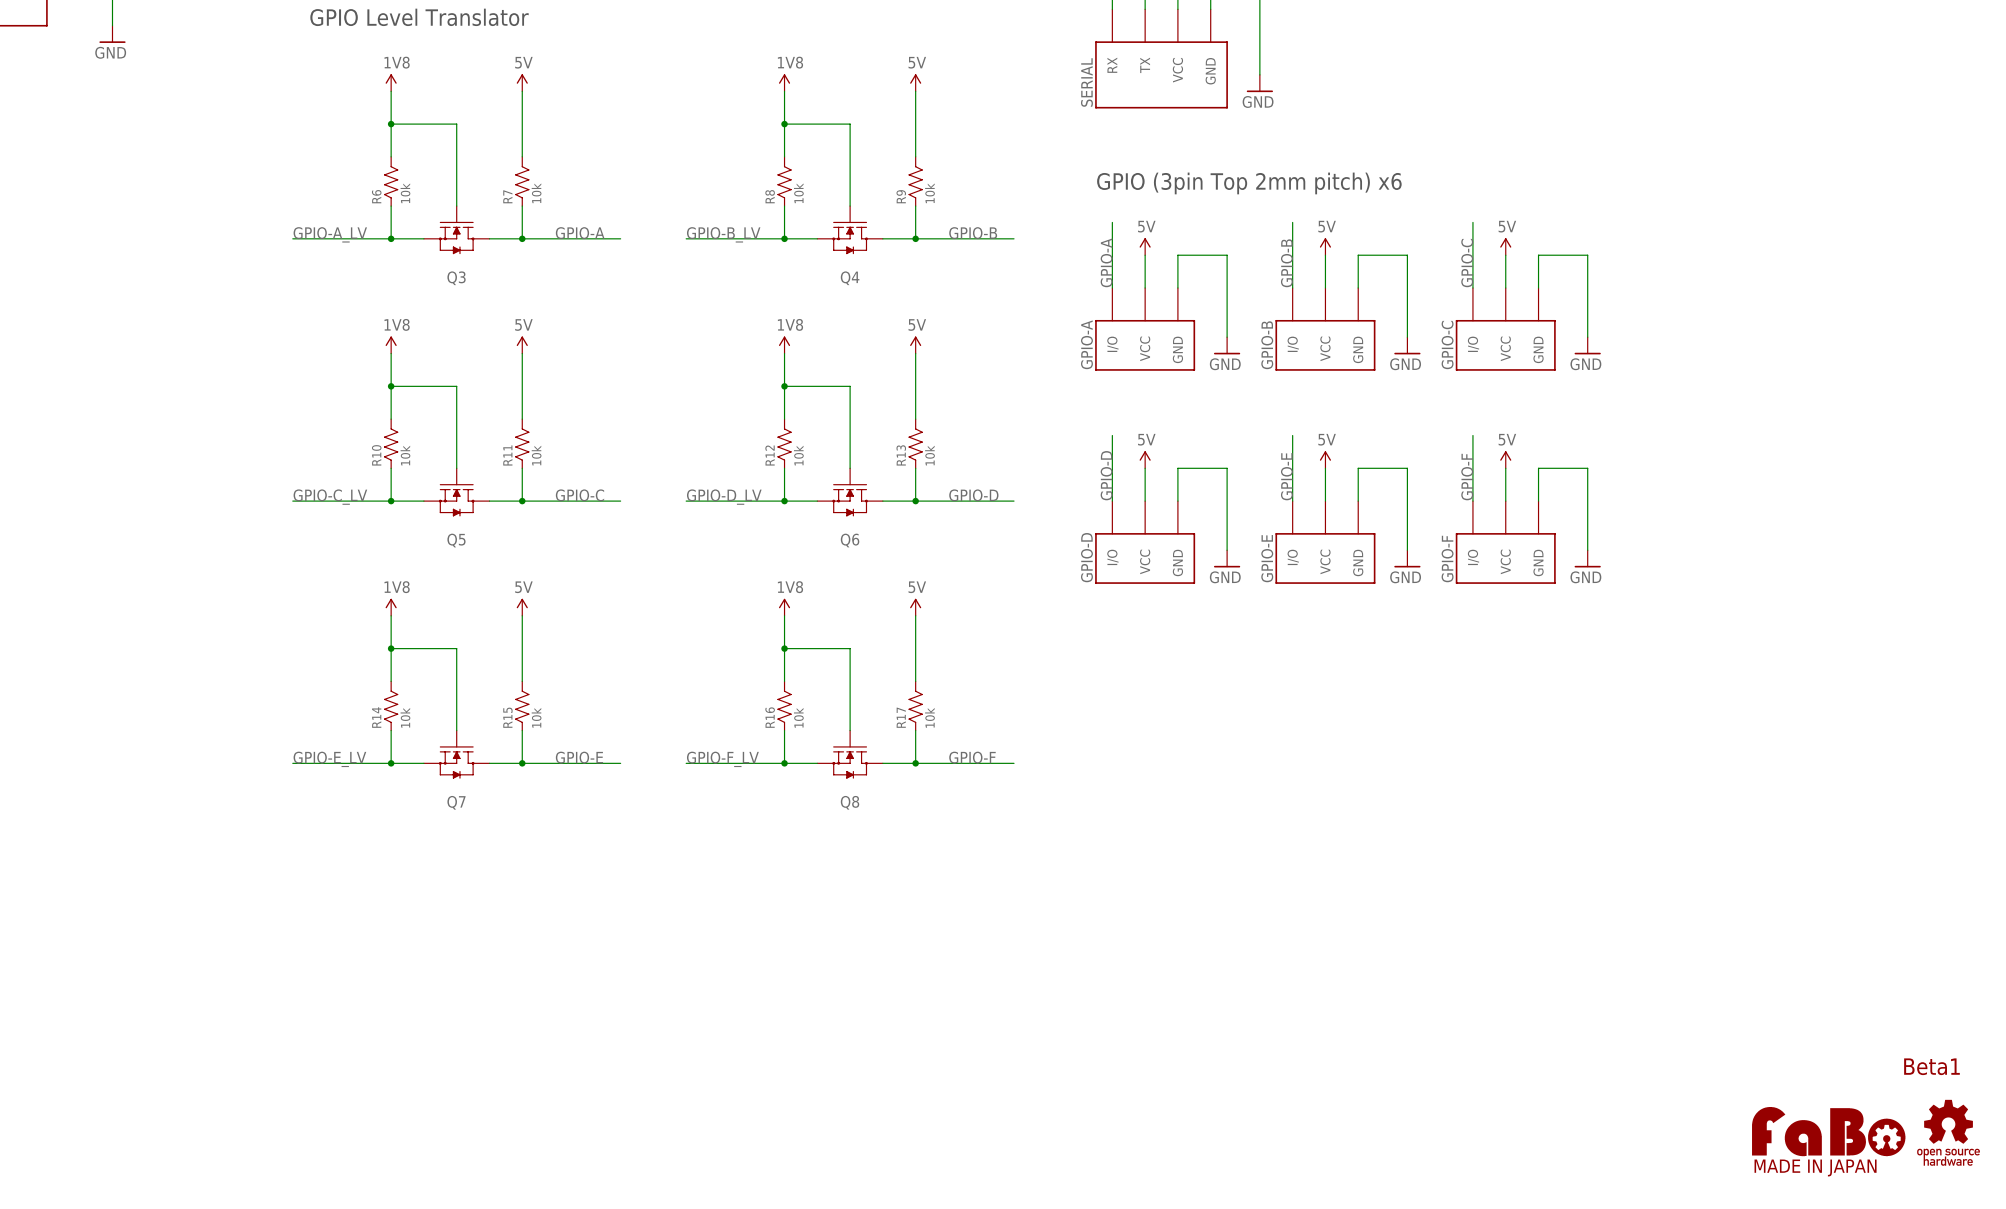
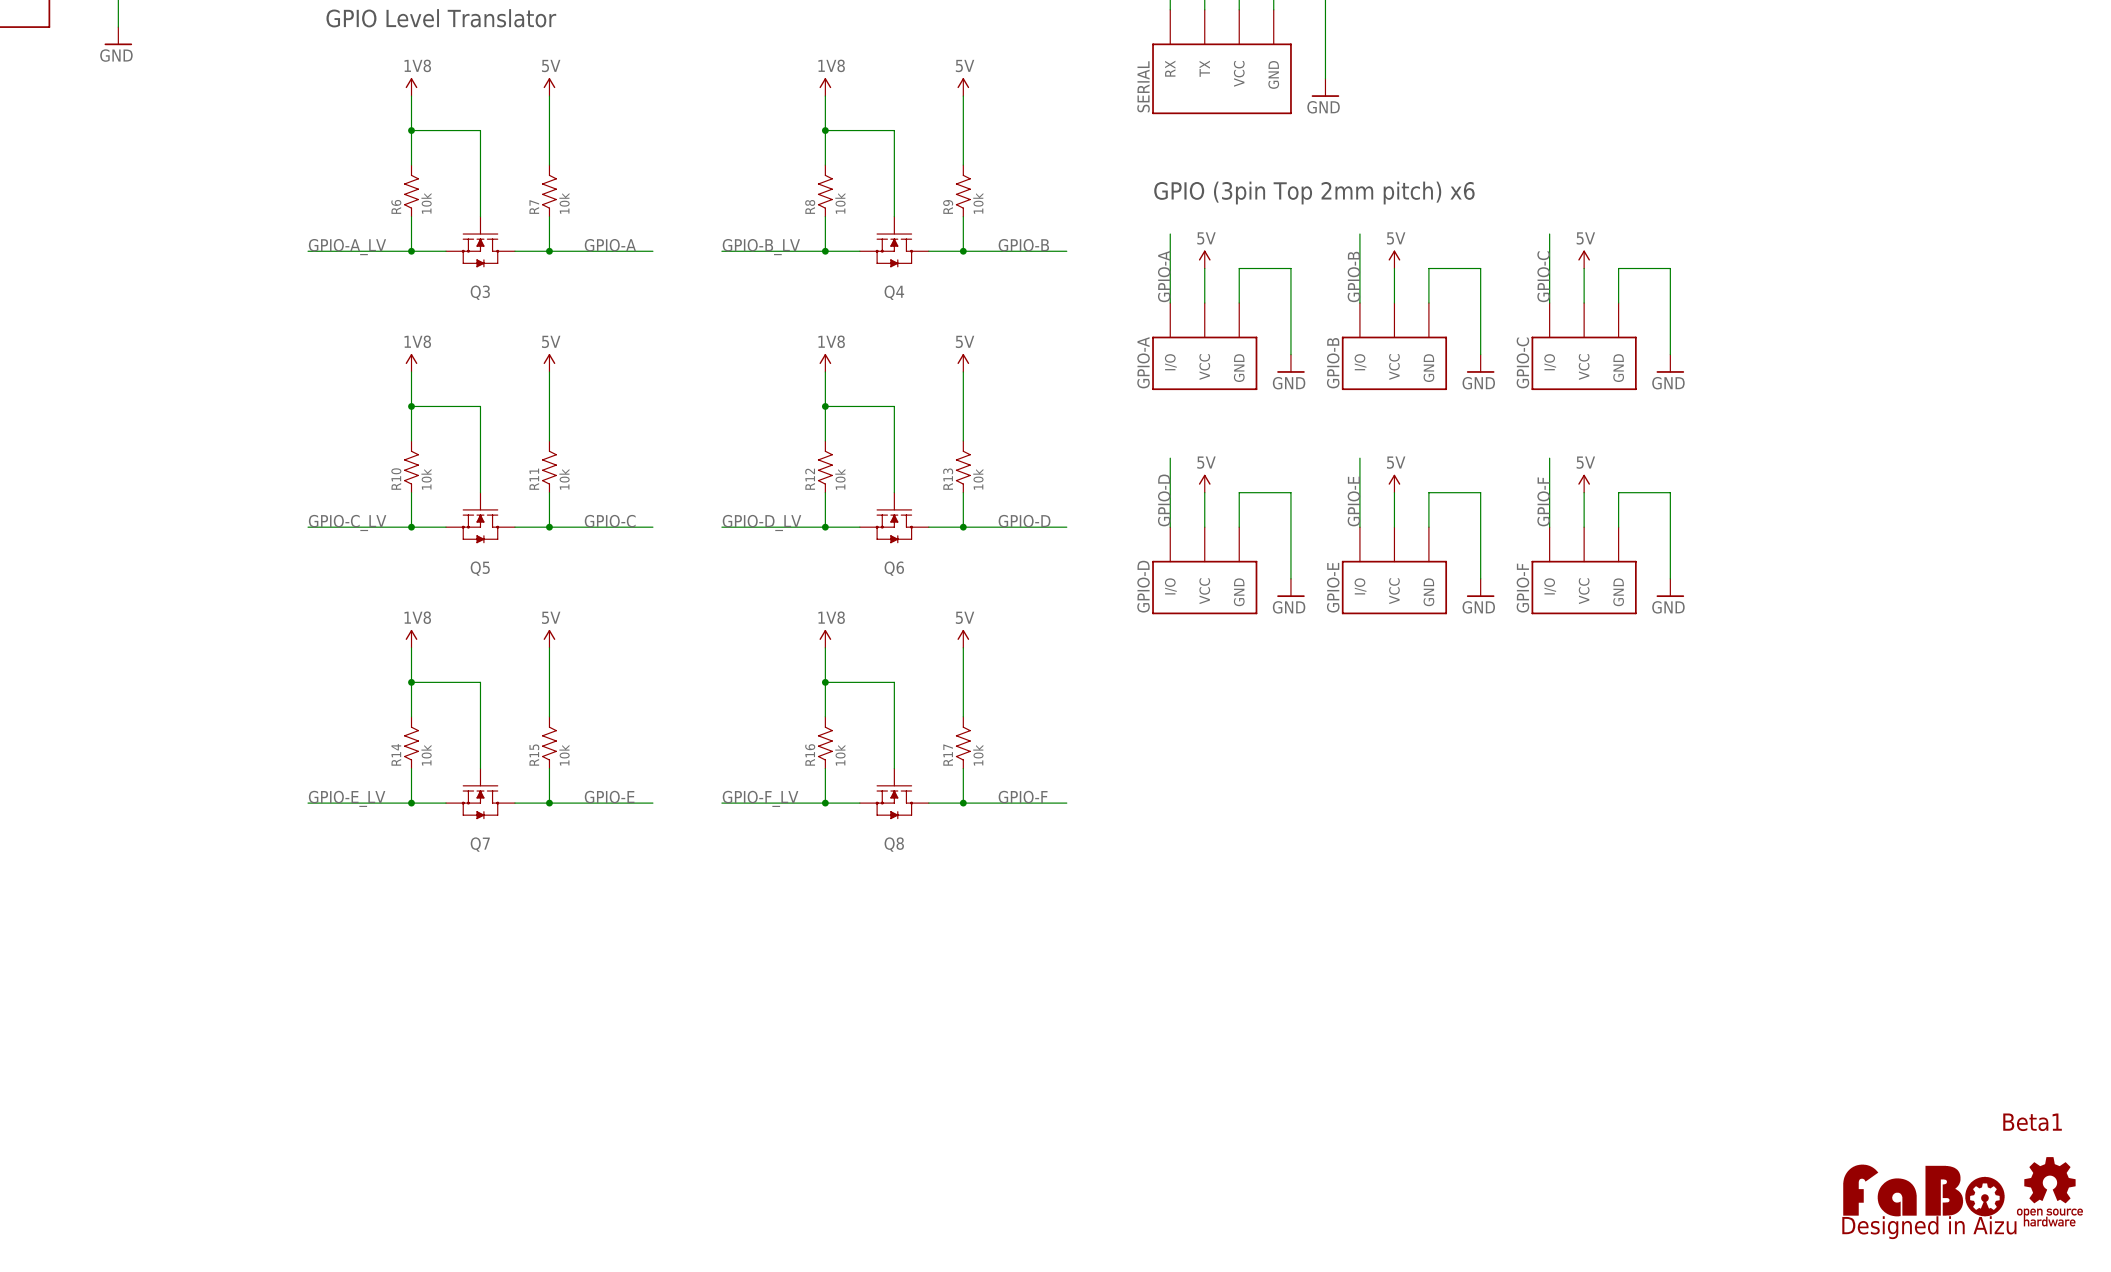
part text: none -> Designed in Aizu (1929, 1227)
part text: MADE IN JAPAN (1815, 1167) -> none

